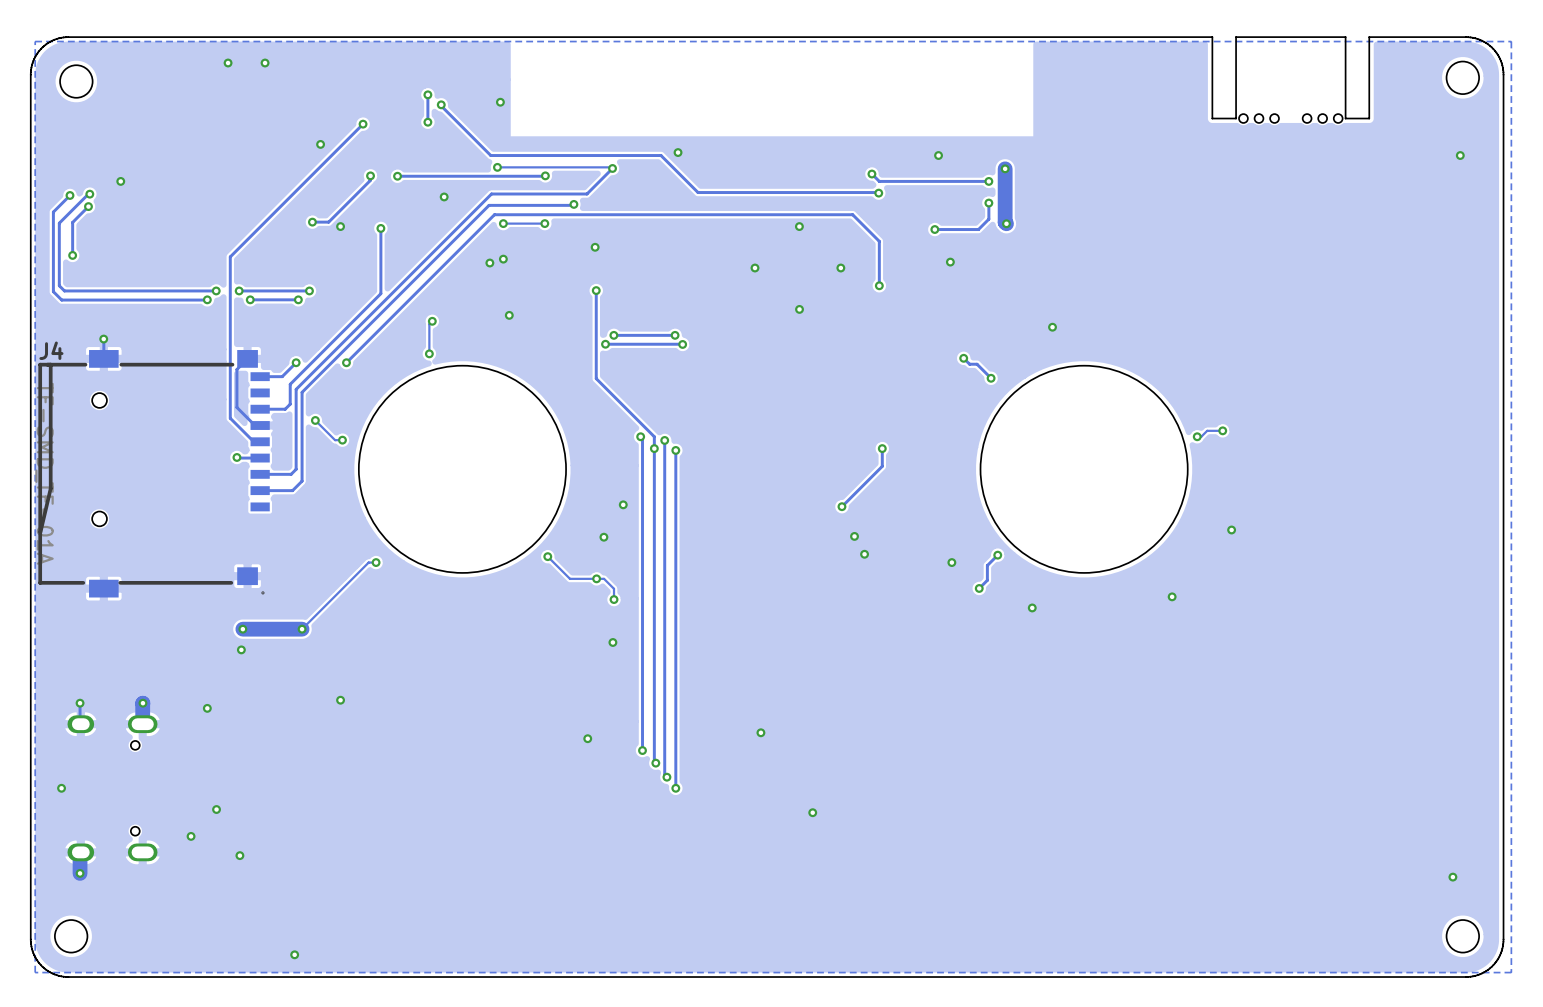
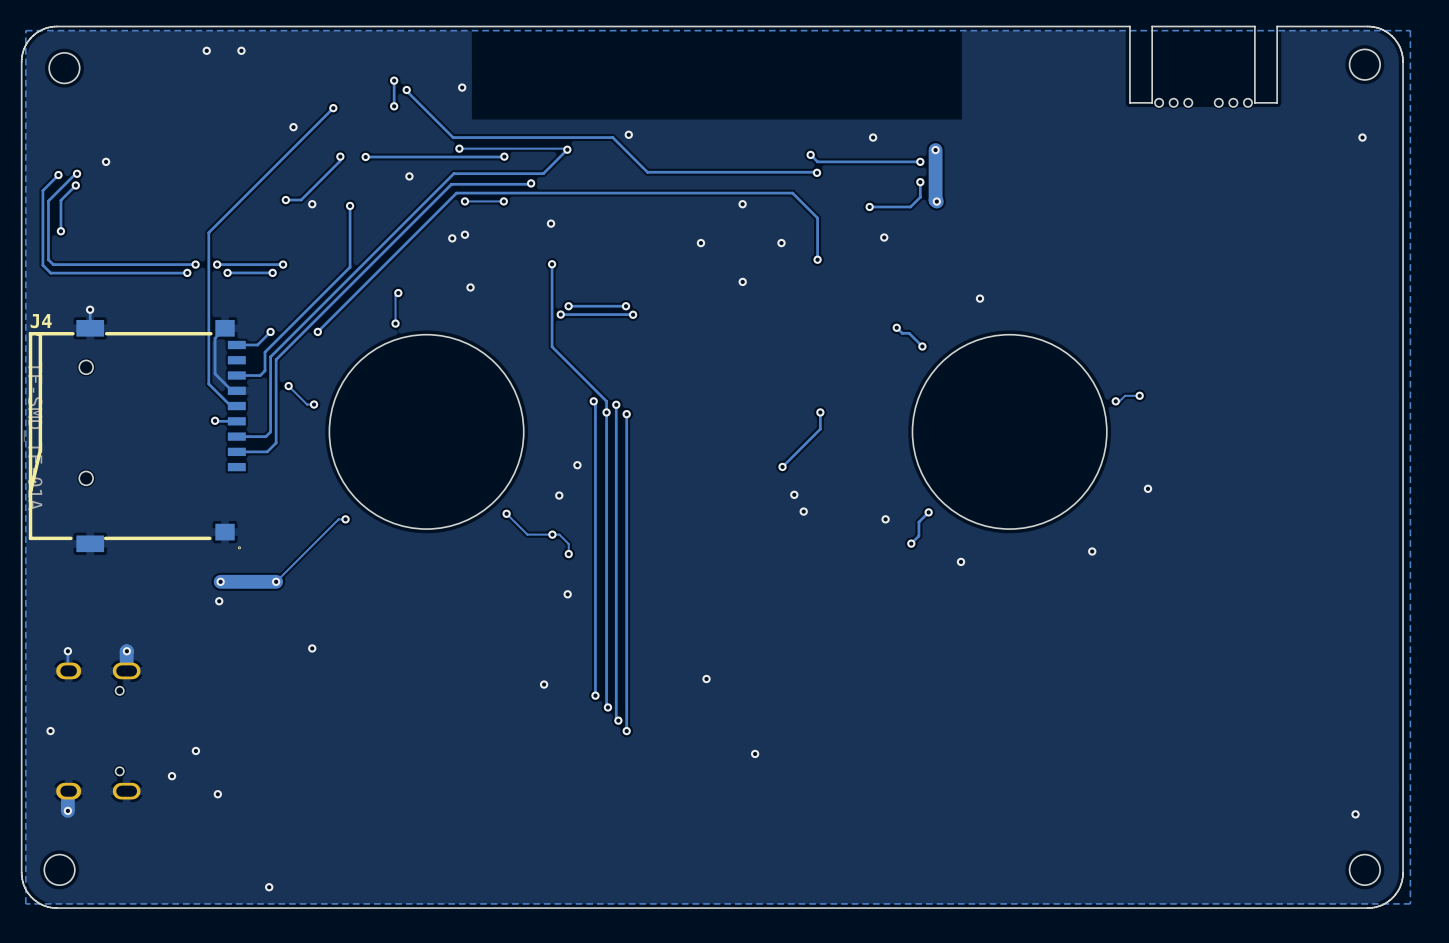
via: (207, 708) -> none

